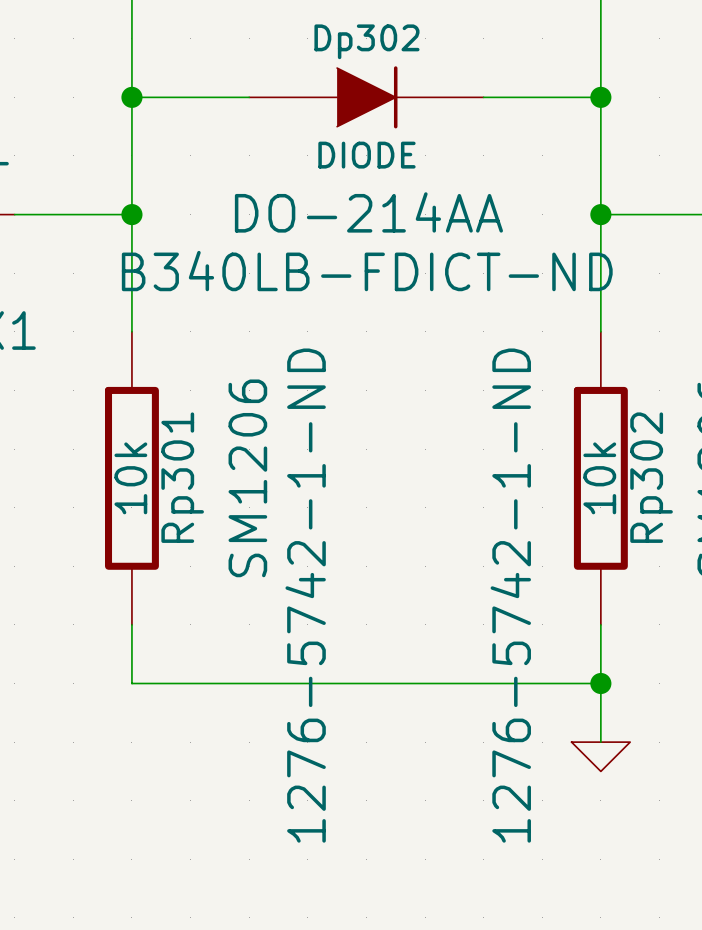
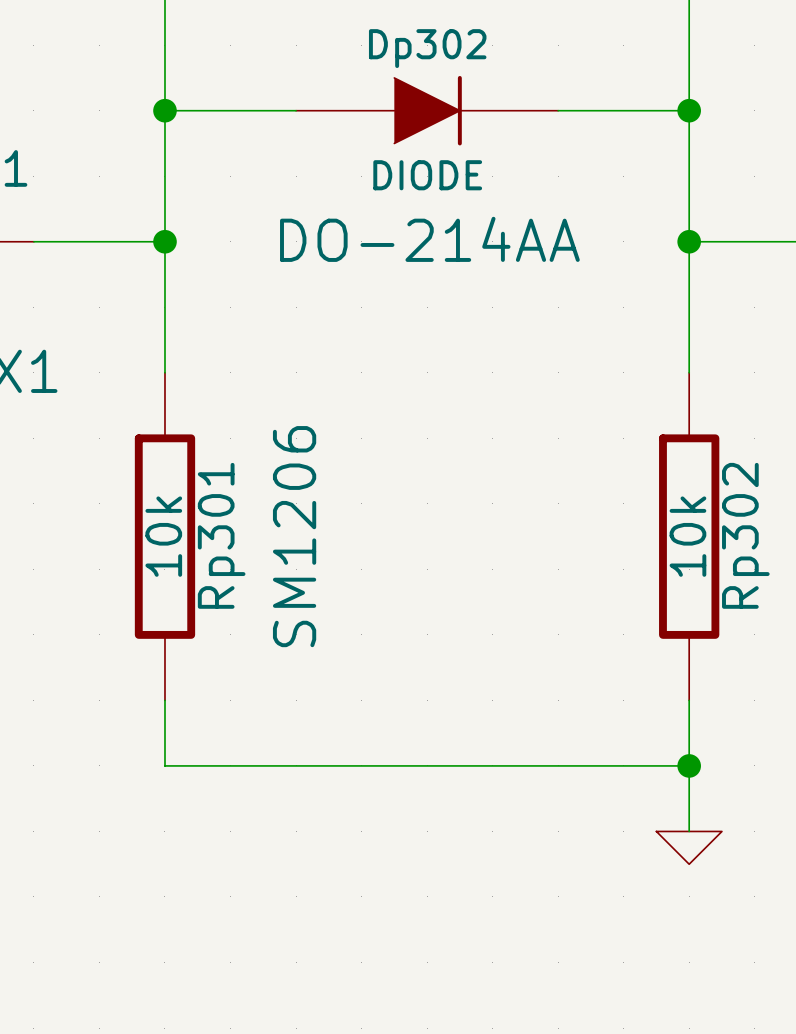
Dp302 text: B340LB-FDICT-ND (367, 271) -> none
Rp301 text: 1276-5742-1-ND (305, 595) -> none
Rp302 text: 1276-5742-1-ND (510, 595) -> none

